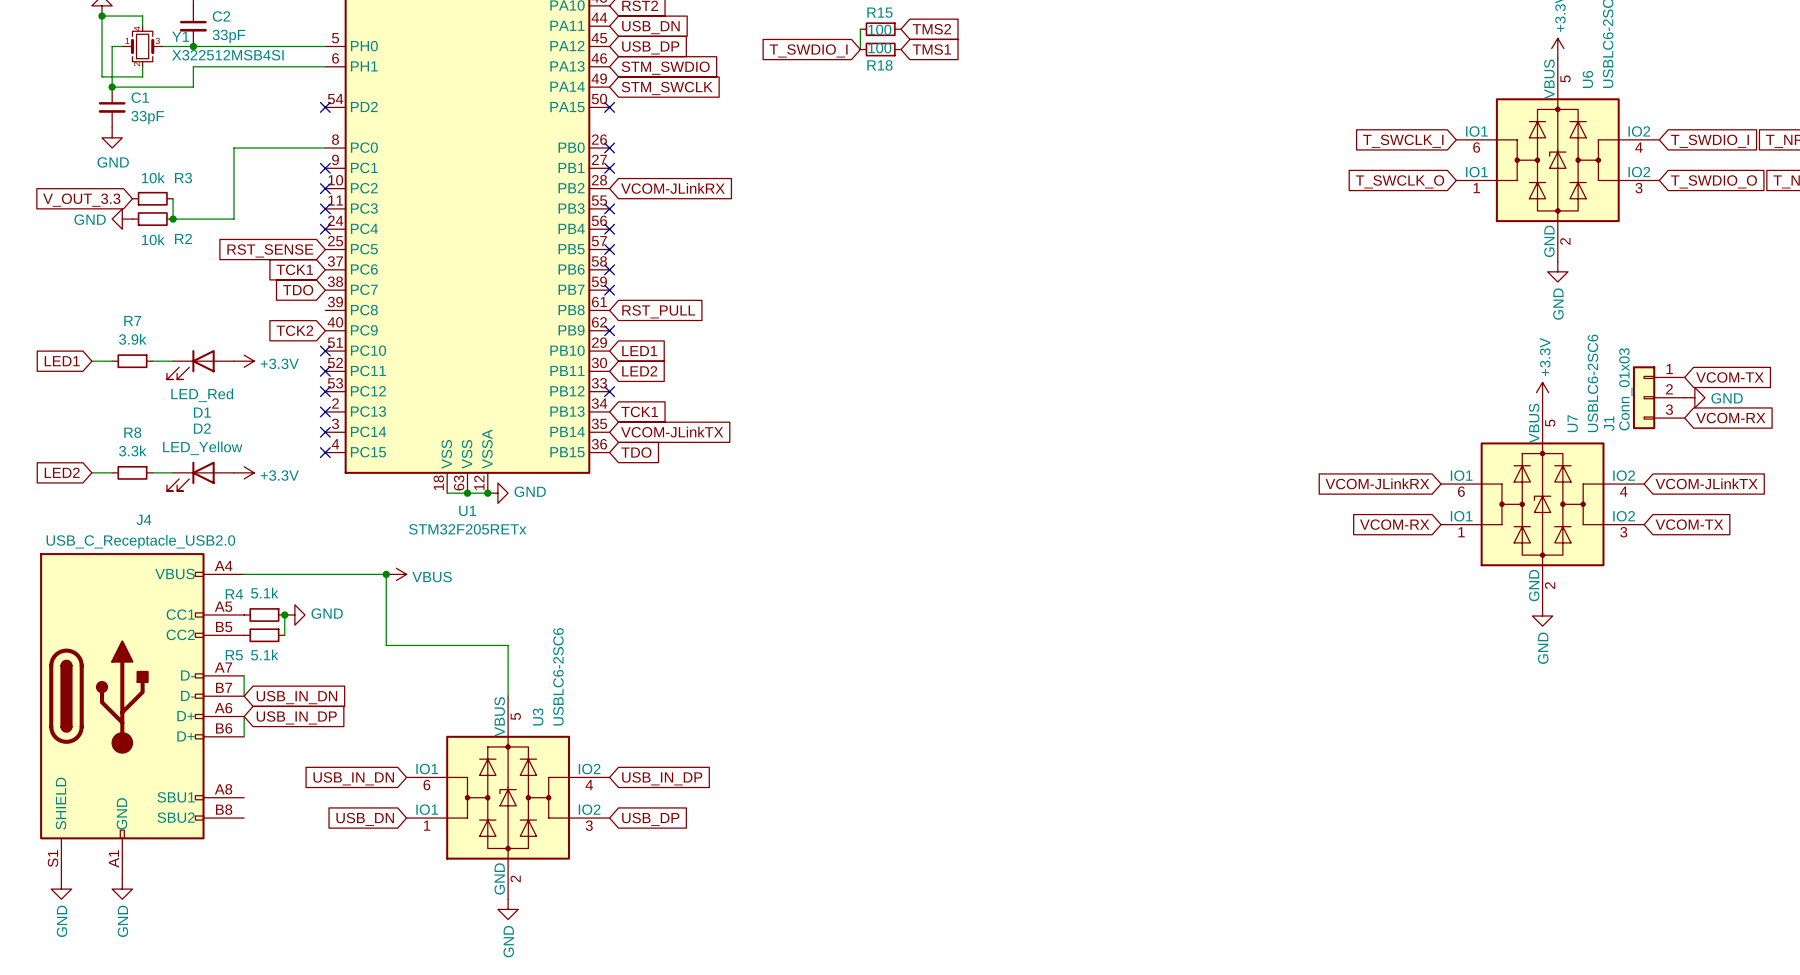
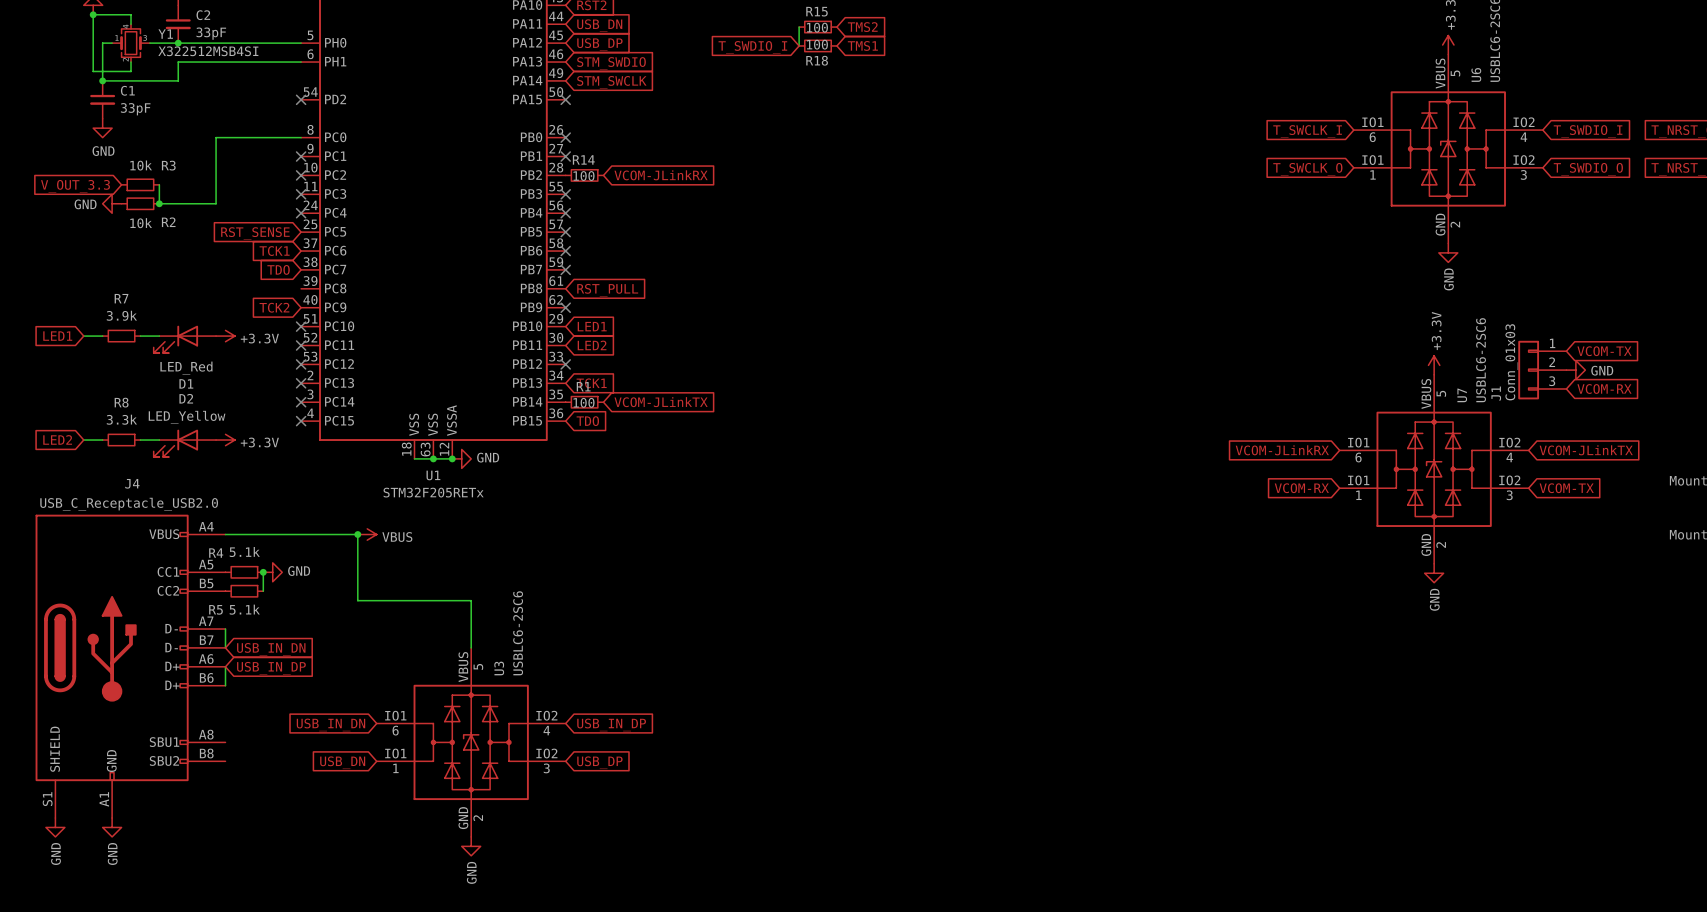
R14: none -> 100 (584, 175)
global label position: VCOM-JLinkRX (672, 188) -> VCOM-JLinkRX (661, 175)
R1: none -> 100 (584, 402)
global label position: VCOM-JLinkTX (672, 432) -> VCOM-JLinkTX (661, 402)

